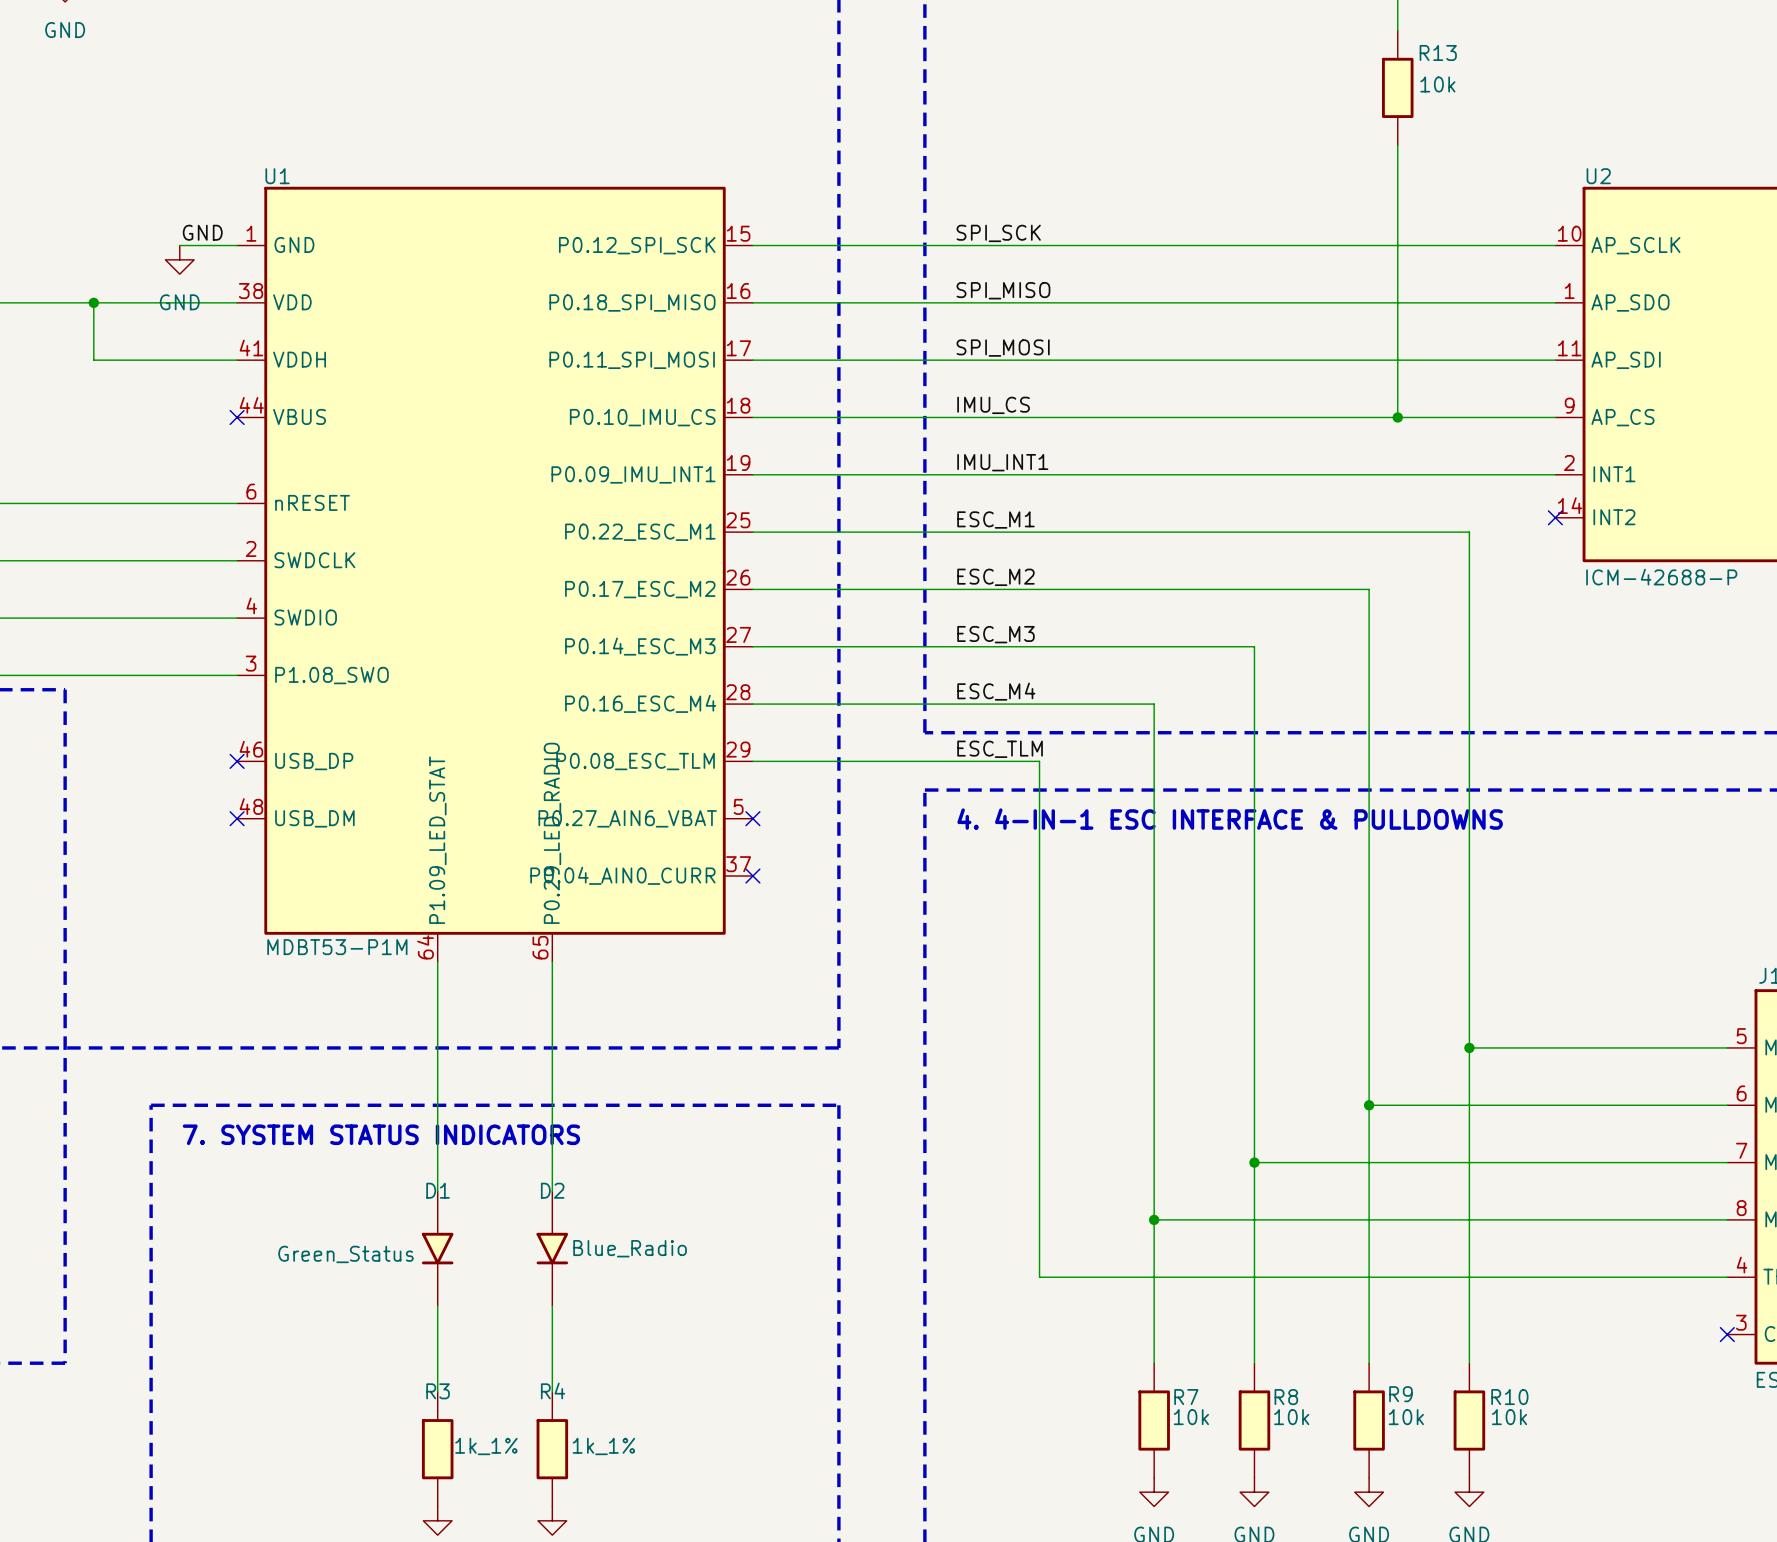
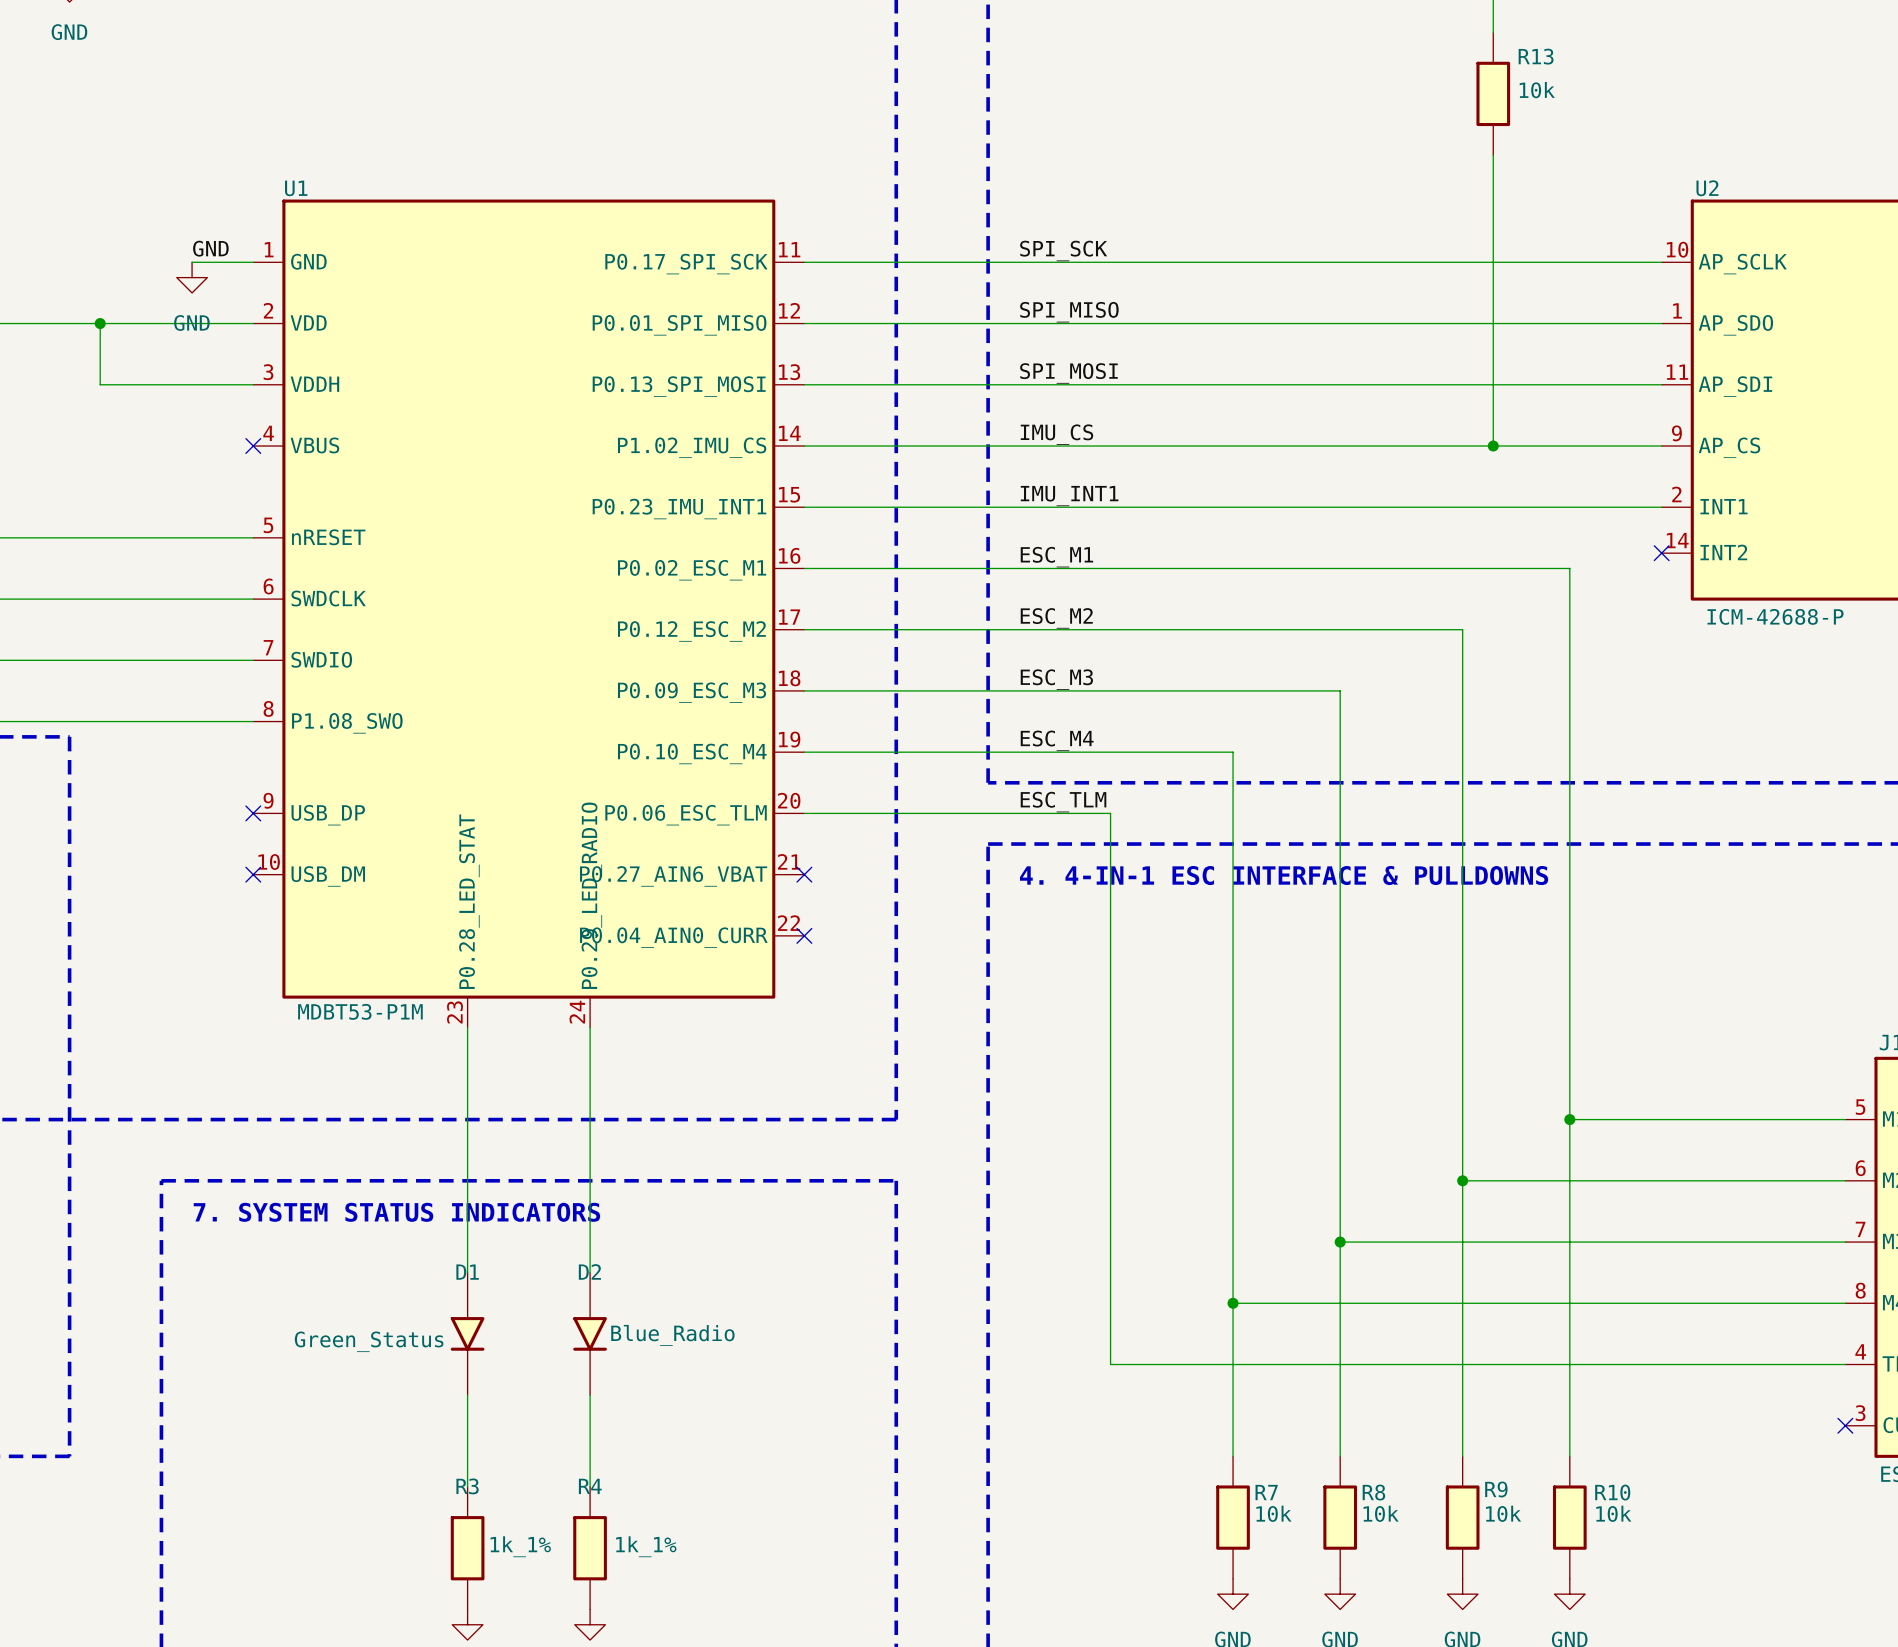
U1 symbol: [237, 186, 753, 962] -> [253, 199, 805, 1028]

